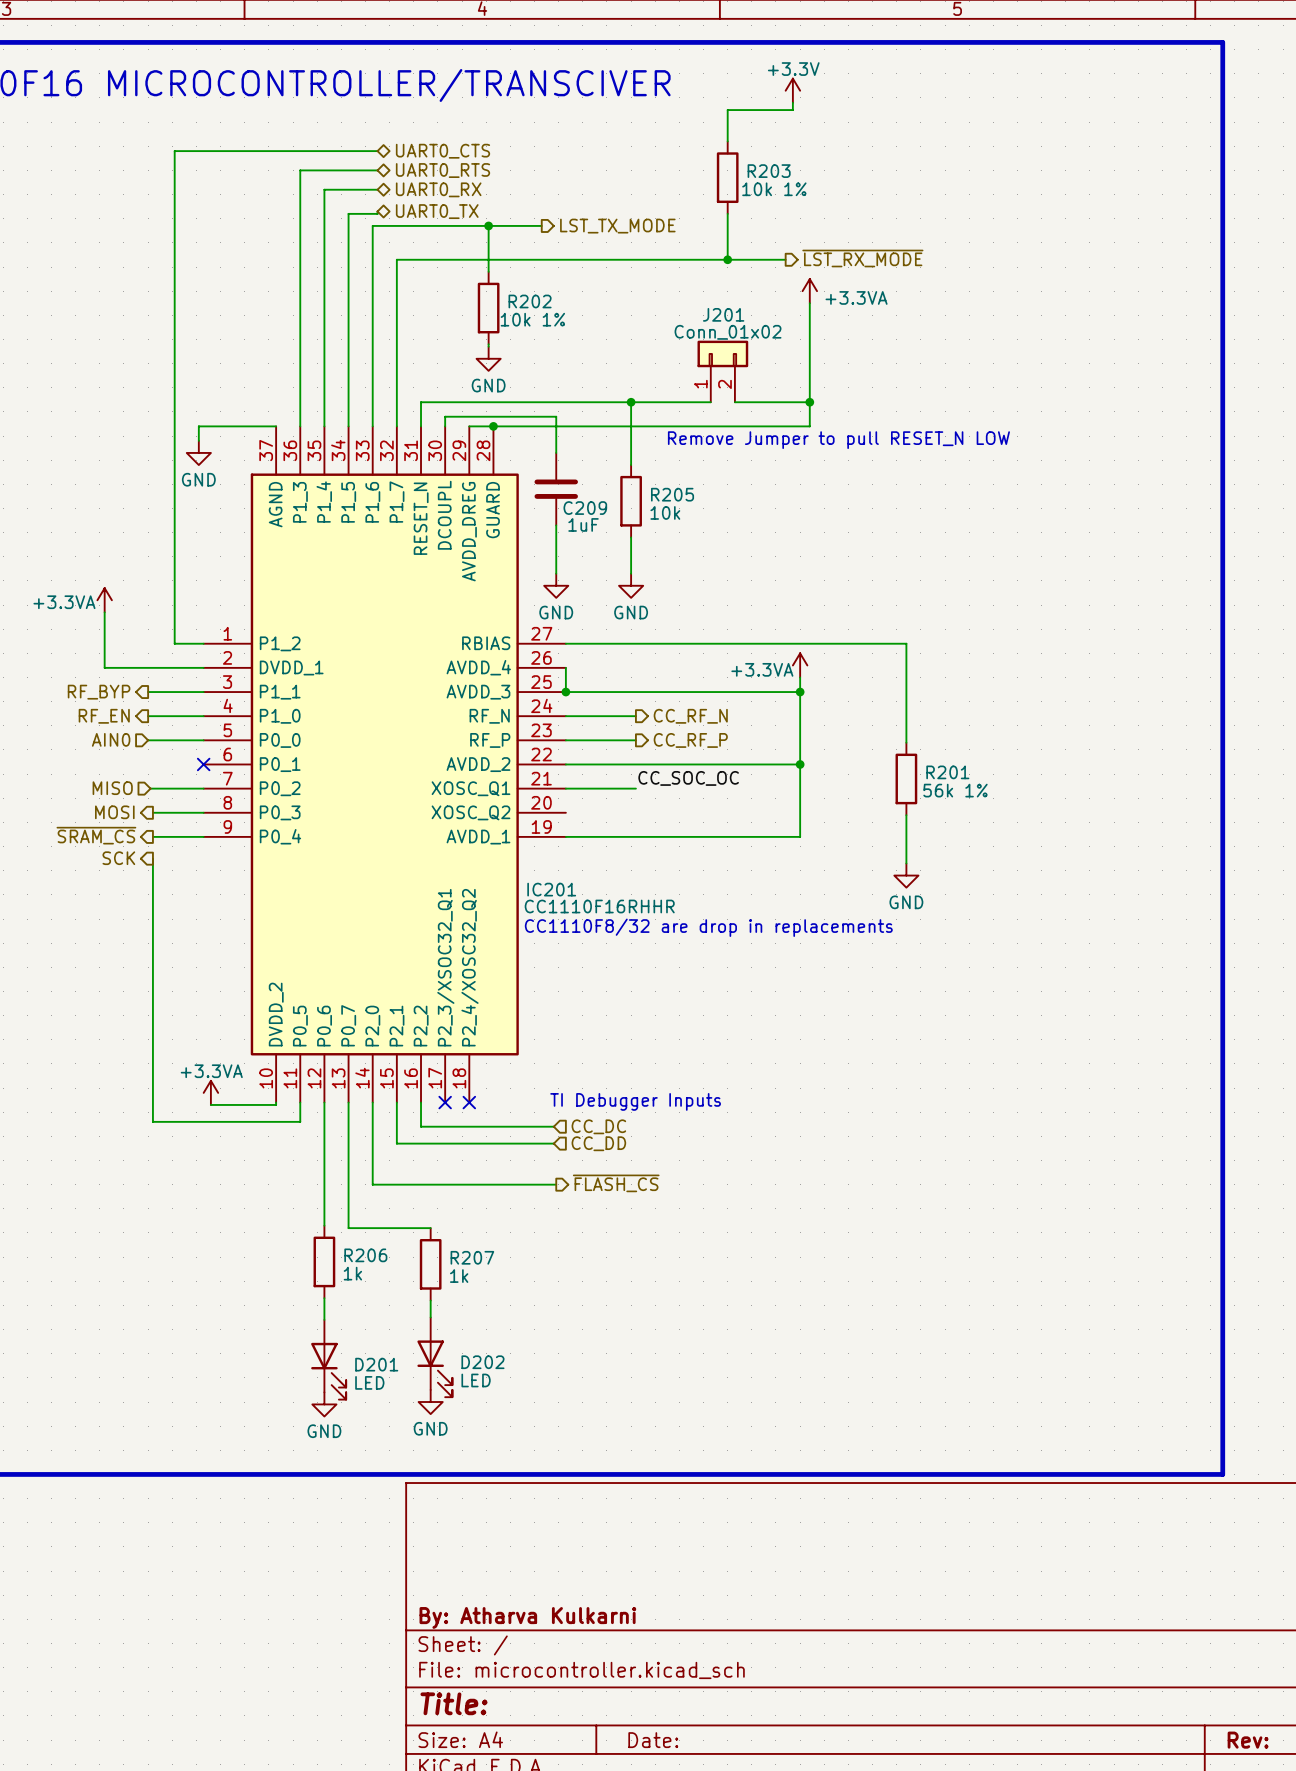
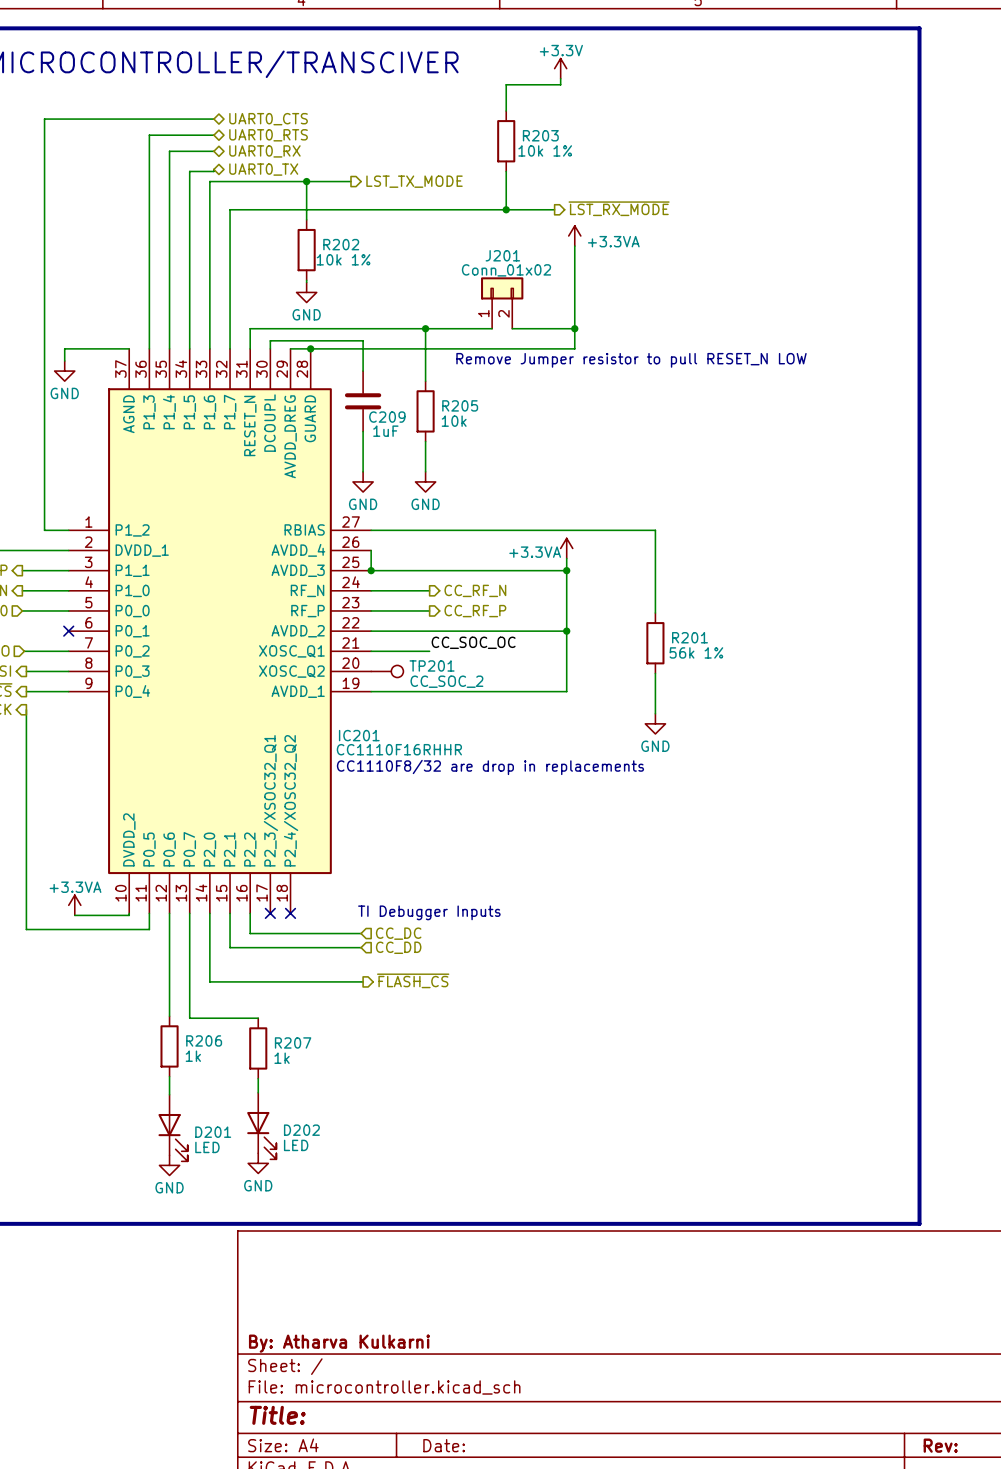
text: Remove Jumper to pull RESET_N LOW (838, 440) -> Remove Jumper resistor to pull RESET_N LOW (631, 360)
TP201: none -> CC_SOC_2 (387, 671)

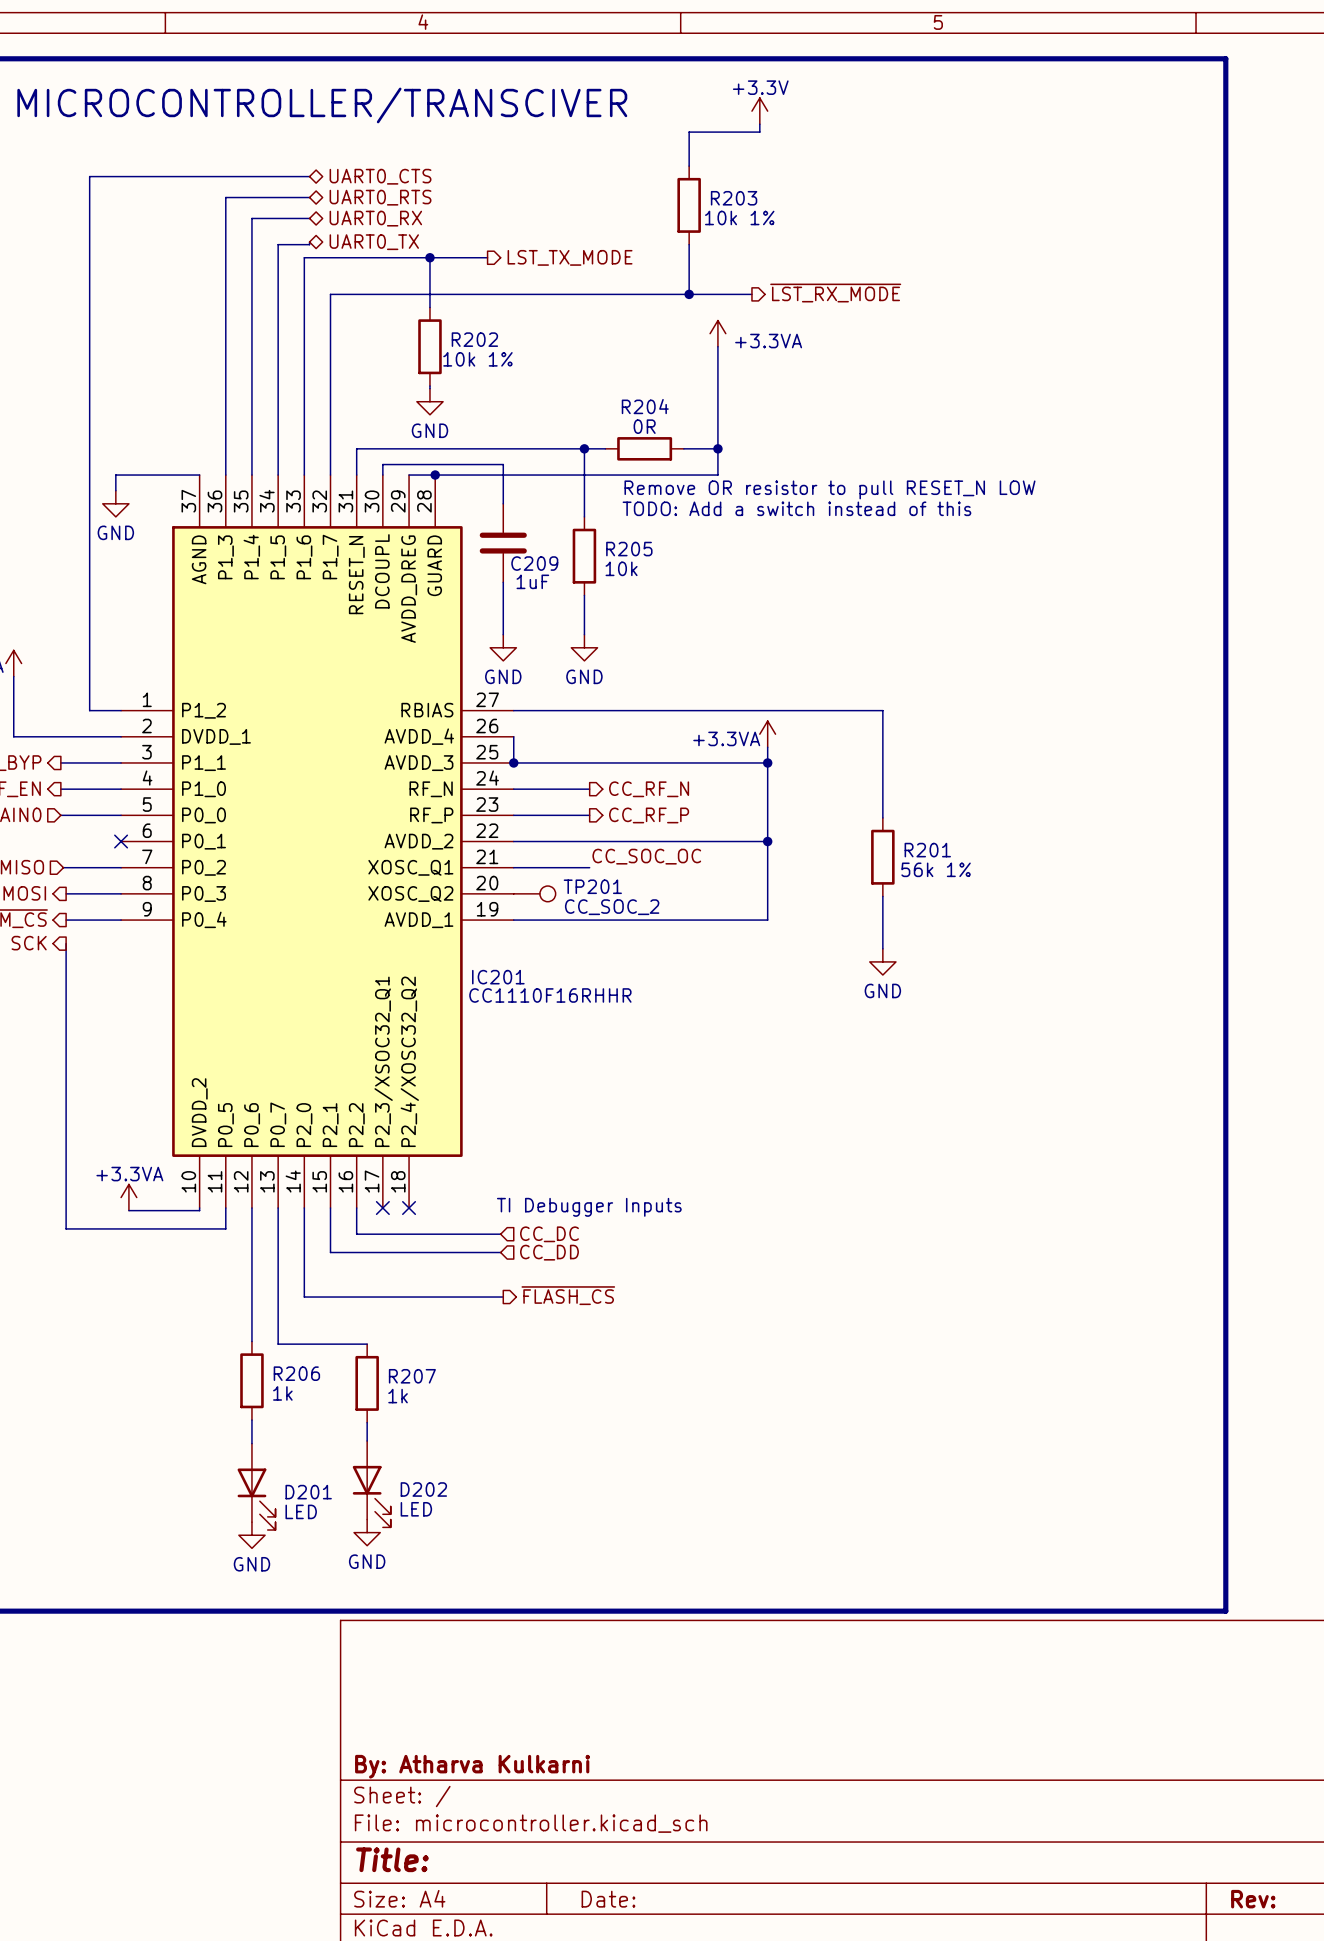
power symbol position: +3.3VA (574, 235) -> +3.3VA (717, 333)
wire: (574, 246) (574, 348) (528, 348) -> (717, 346) (717, 475)
J201: Conn_01x02 (502, 303) -> none
wire: (441, 328) (492, 328) -> none
R204: none -> 0R (644, 448)
wire: none -> (683, 448) (697, 448)
wire: (528, 328) (574, 328) -> none
junction position: (574, 328) -> (717, 448)
text: Remove Jumper resistor to pull RESET_N LOW (631, 360) -> Remove OR resistor to pull RESET_N LOW (829, 489)
text: none -> TODO: Add a switch instead of this (796, 508)
text: CC1110F8/32 are drop in replacements (490, 767) -> none

